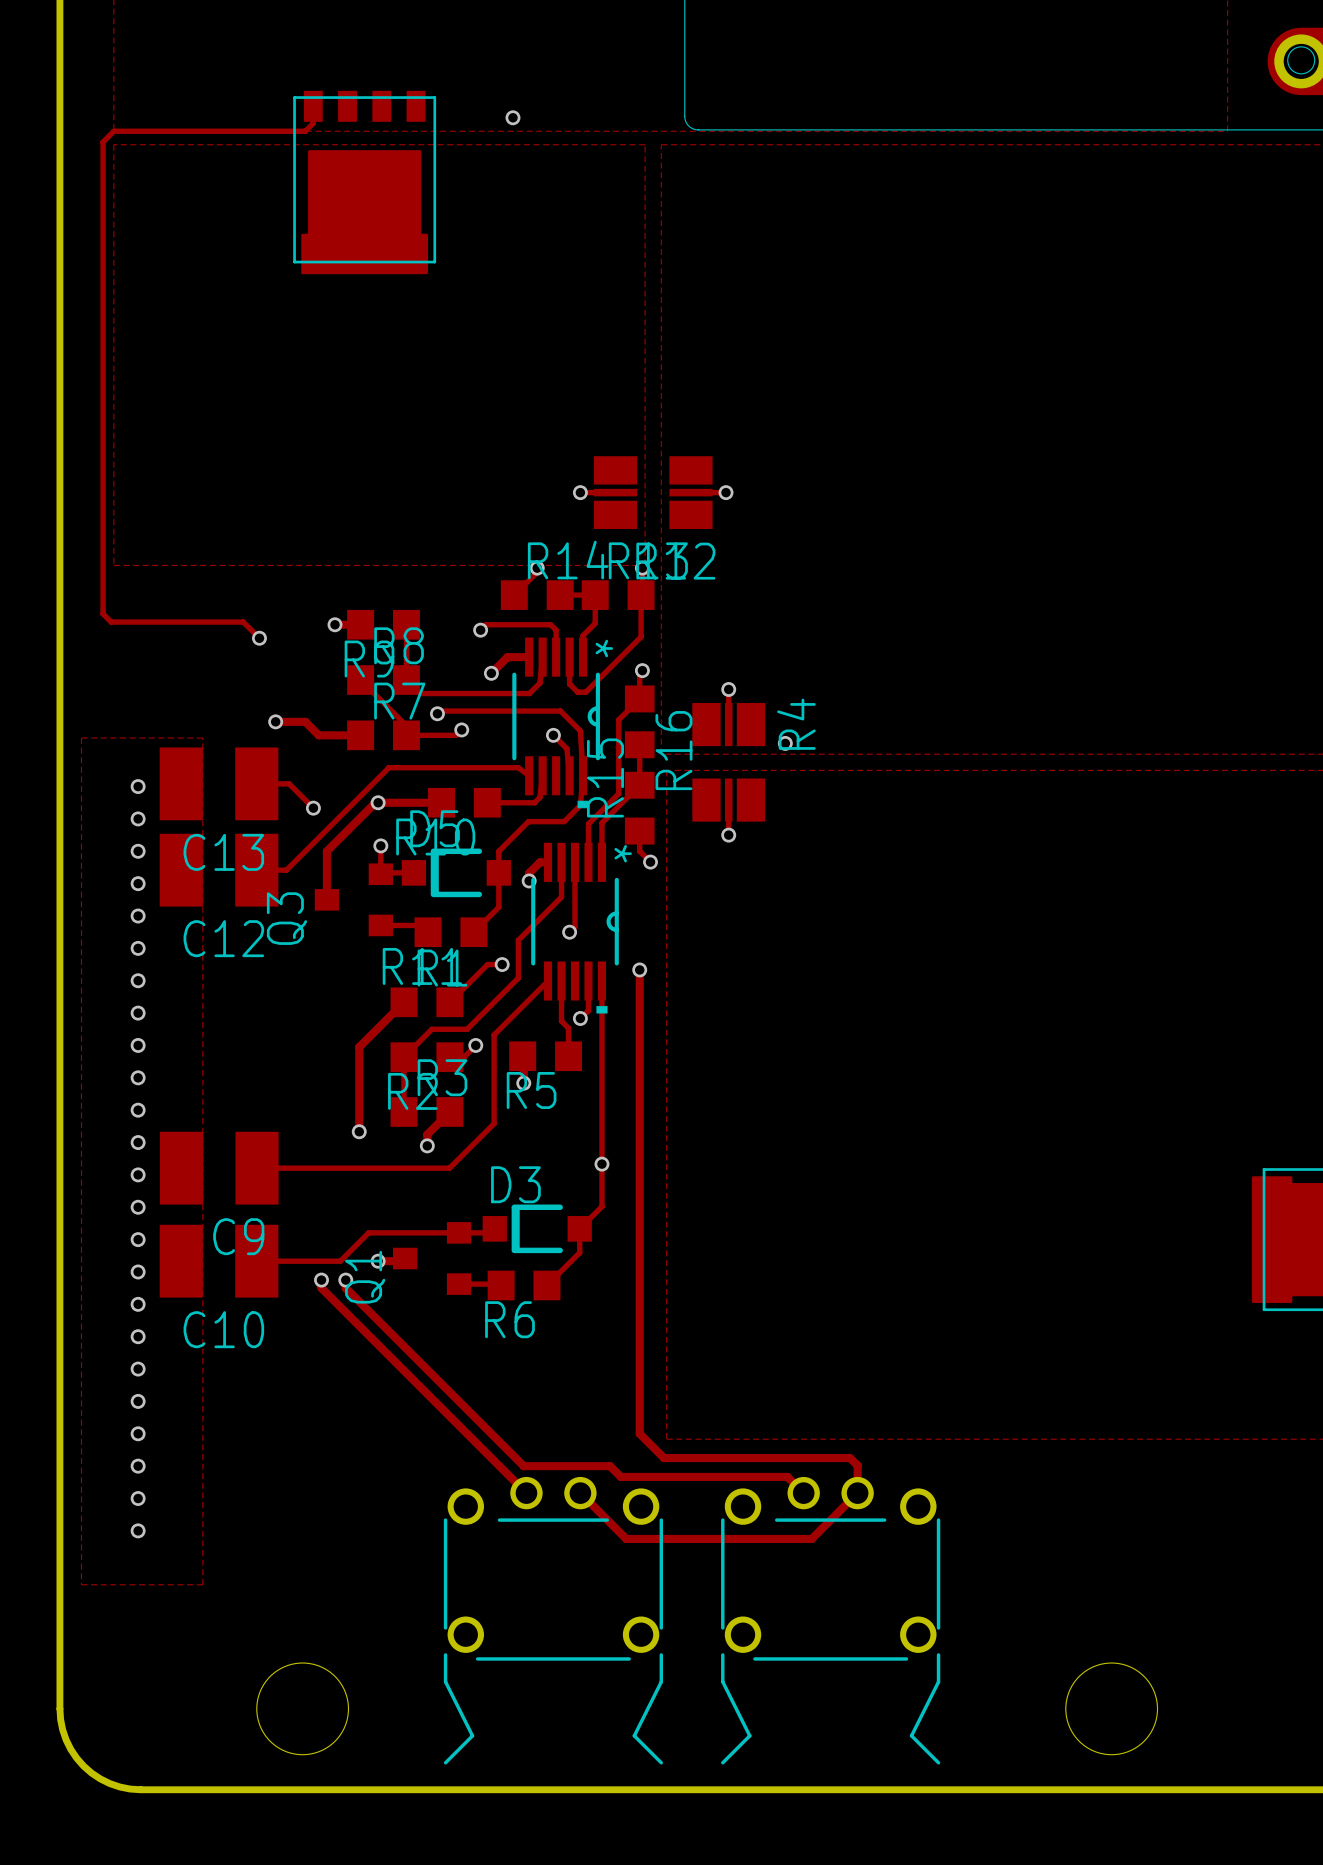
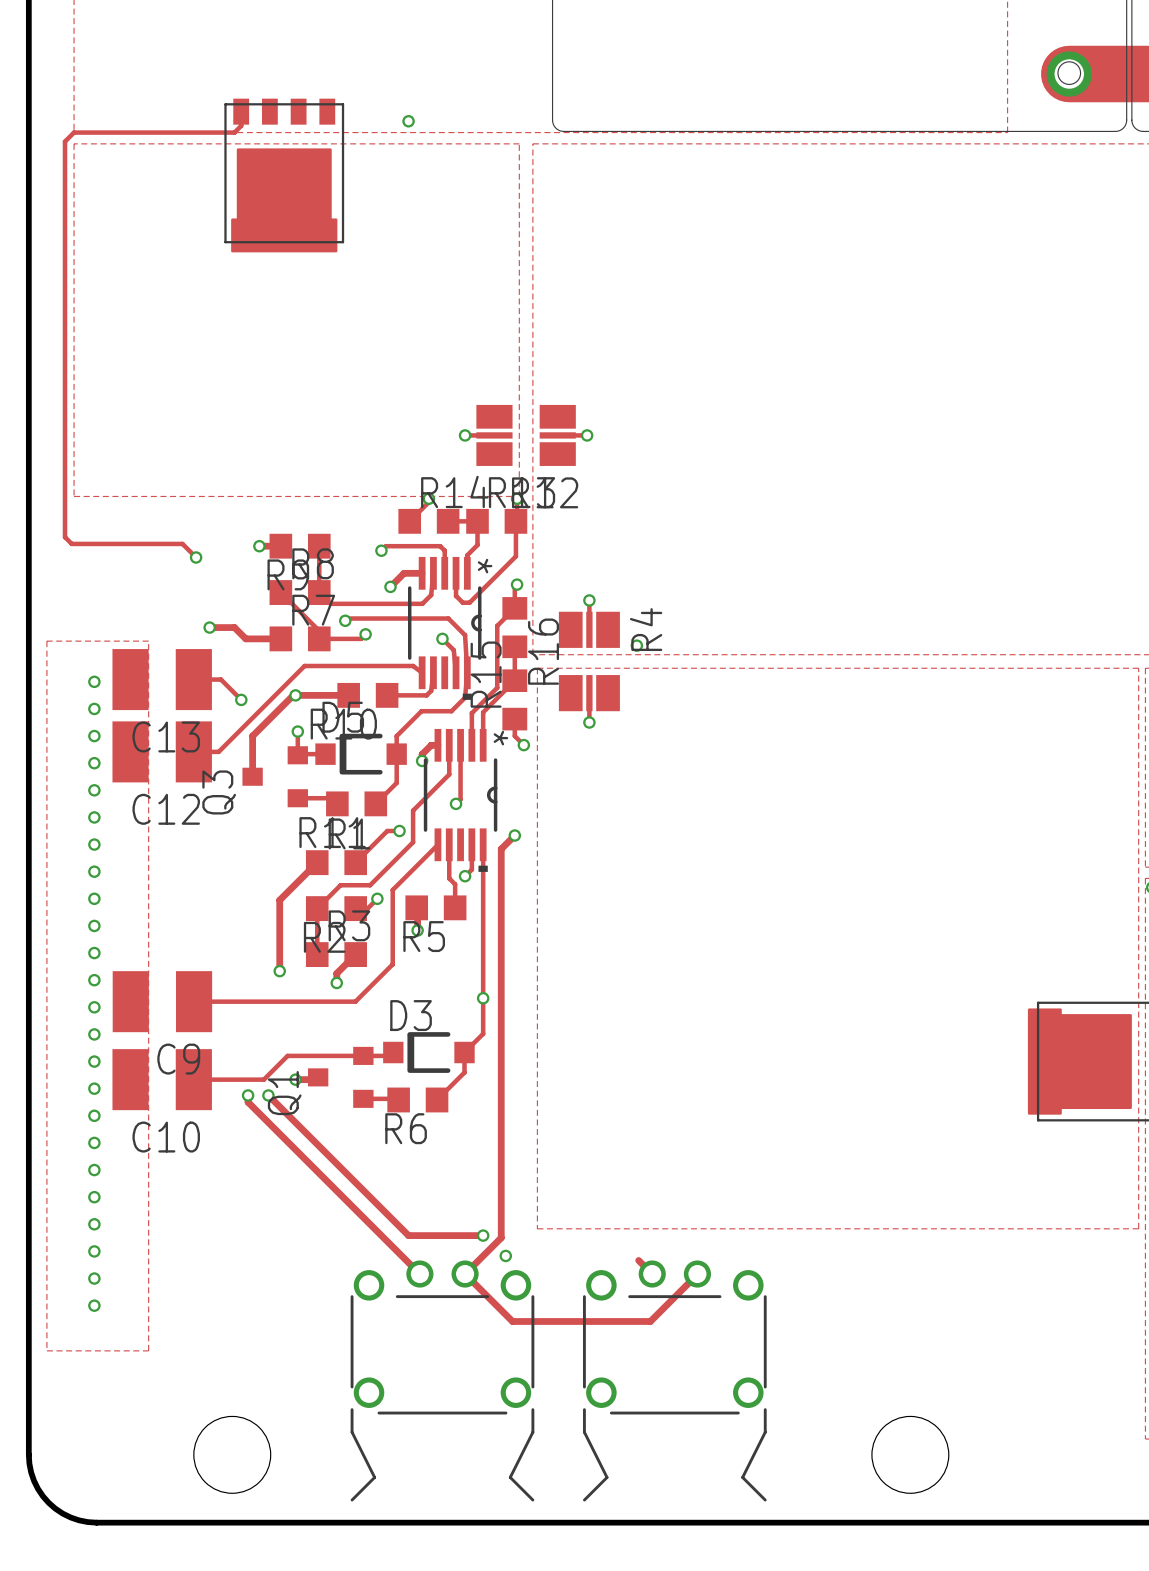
track: (639, 969) (639, 1433) (664, 1458) (850, 1458) (857, 1465) (857, 1493) (811, 1538) (626, 1538) -> (514, 835) (501, 849) (501, 1237) (465, 1274)
track: (345, 1280) (345, 1288) (523, 1466) (610, 1466) (620, 1476) (787, 1476) -> (268, 1095) (408, 1235) (483, 1235)
via: none -> (483, 1235)
via: none -> (505, 1255)
track: none -> (697, 1274) (650, 1321) (512, 1321) (503, 1312)

